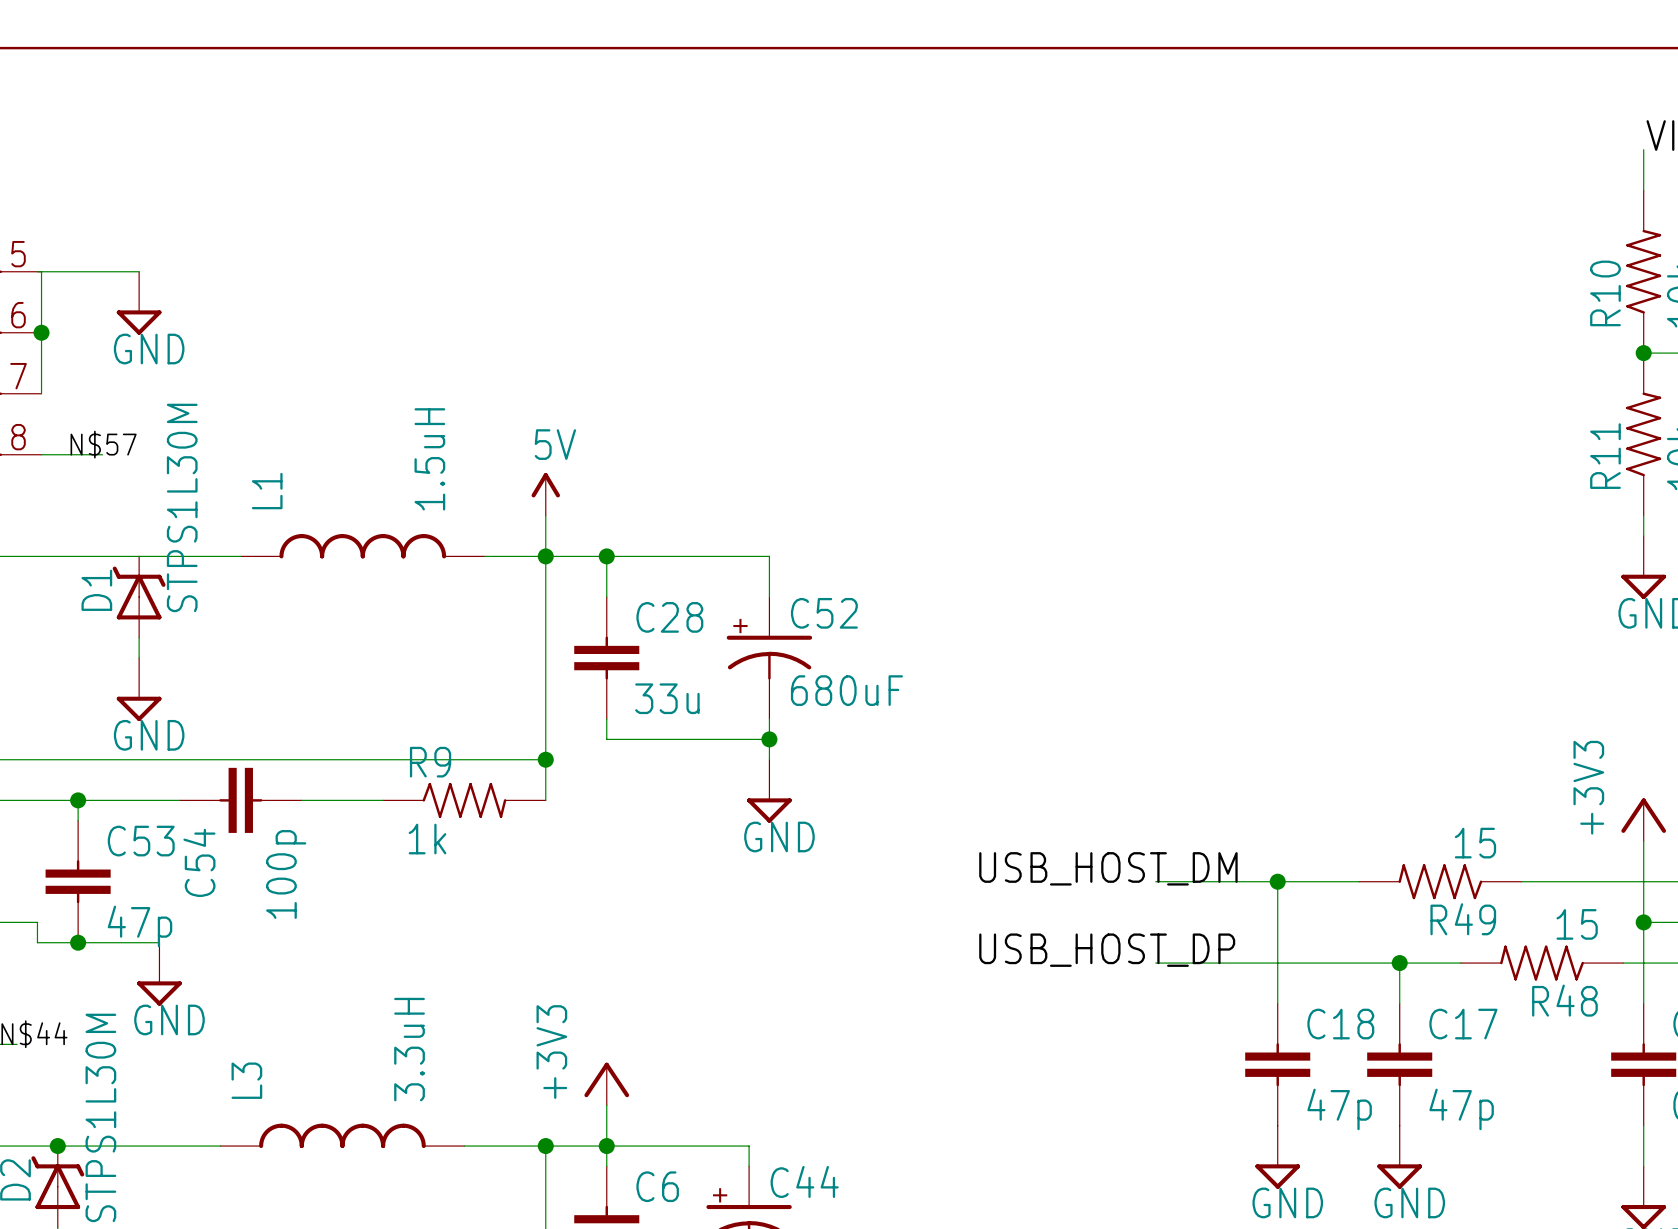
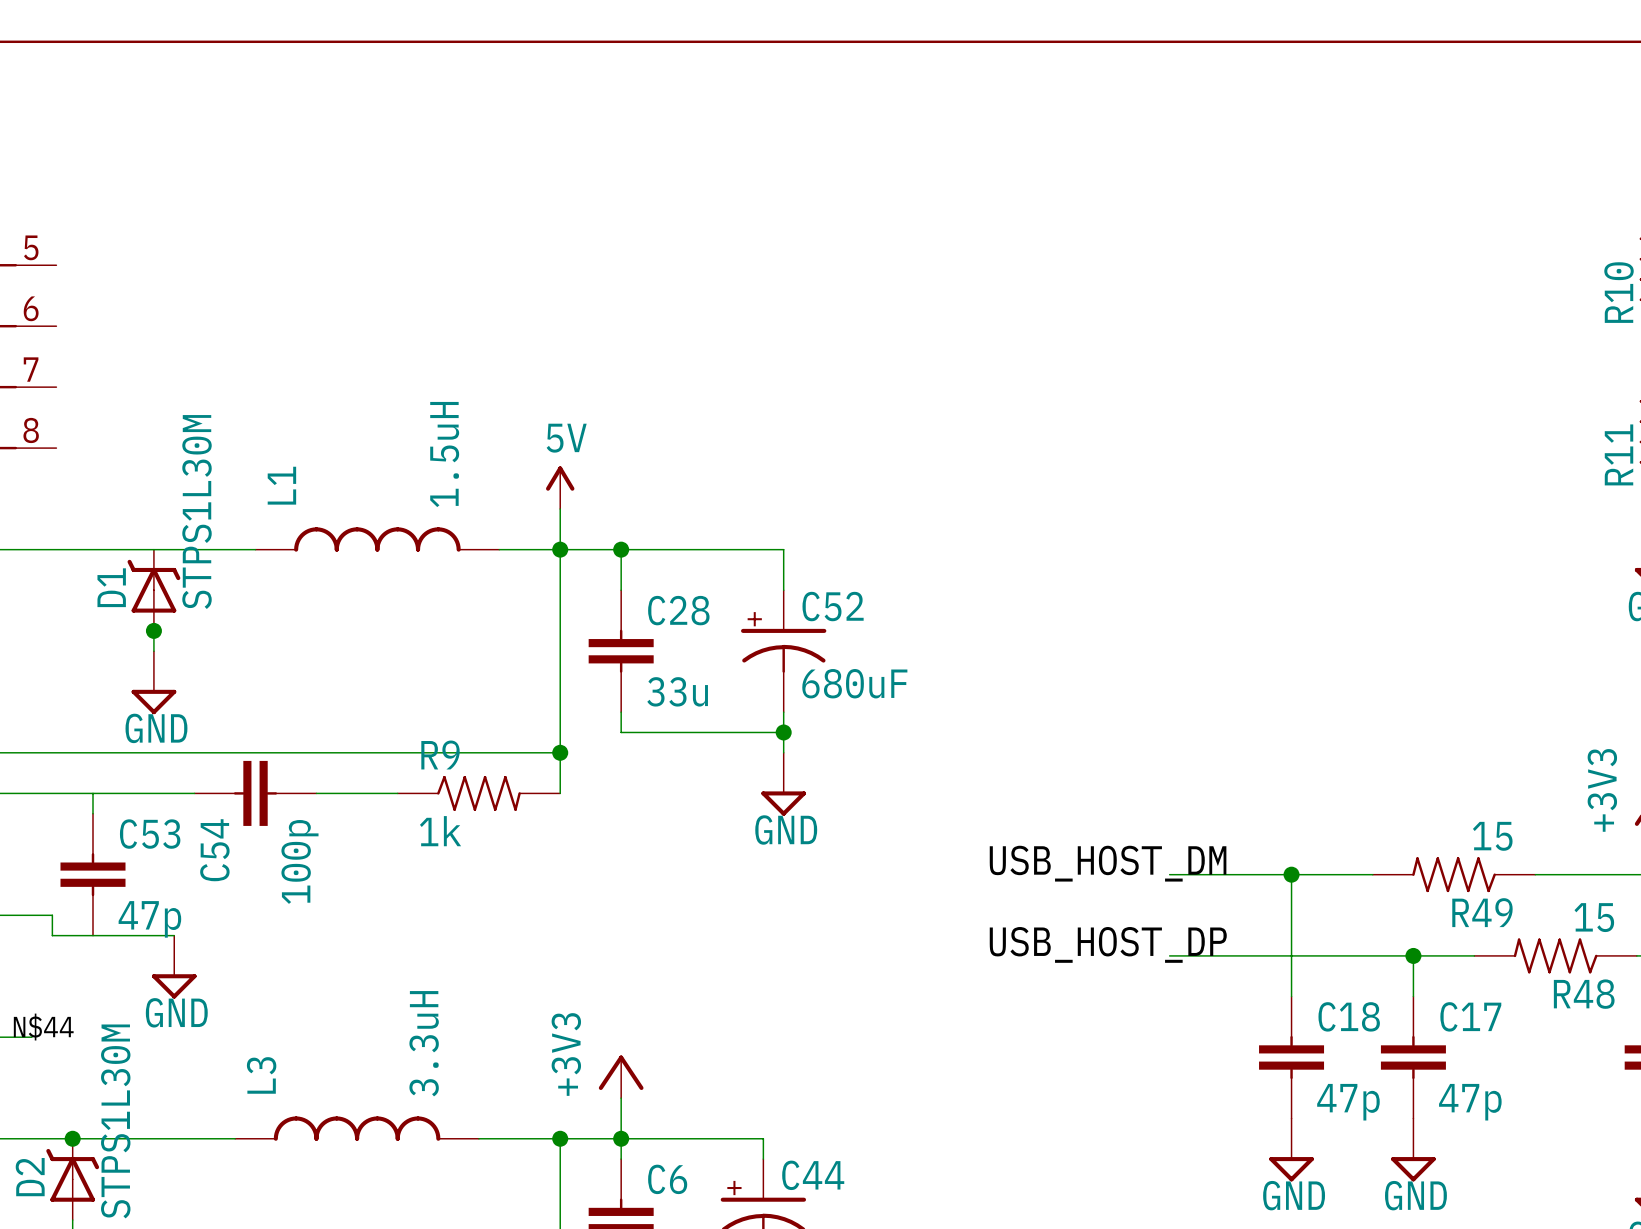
wire: (37, 271) (139, 271) -> none
wire: (41, 271) (41, 393) -> none
power symbol: GND (139, 303) -> none
junction: (41, 332) -> none
label: N$57 (103, 444) -> none
wire: (41, 454) (102, 454) -> none
junction: none -> (153, 630)
junction: (78, 800) -> none
junction: (78, 942) -> none

